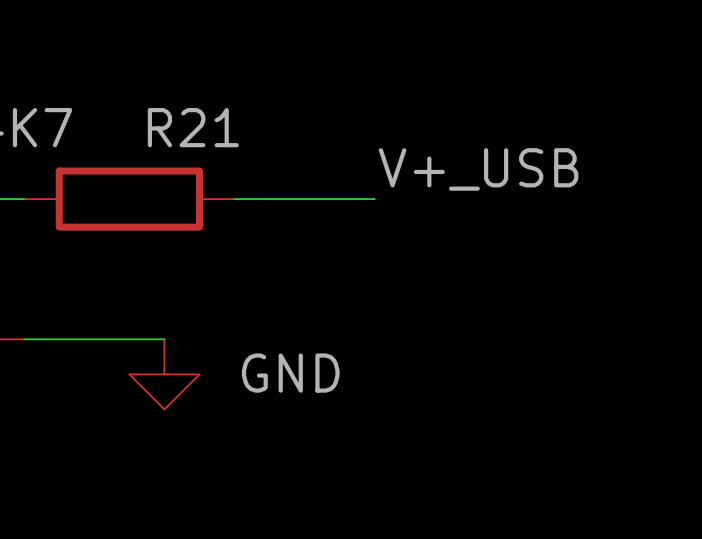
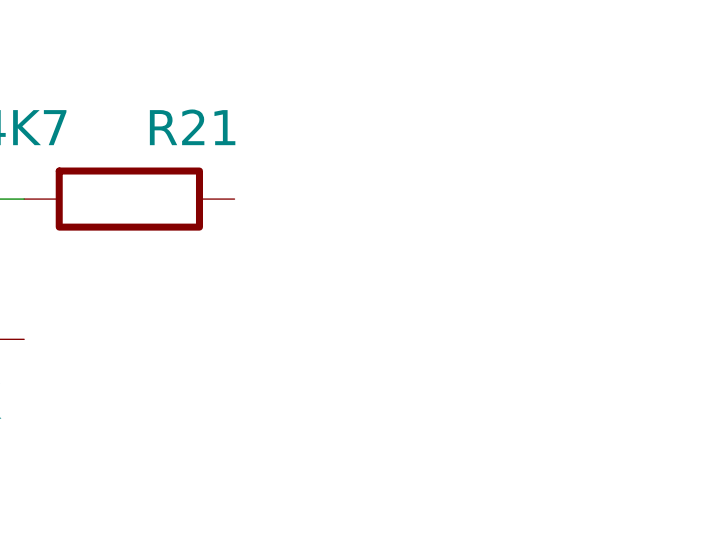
label: V+_USB (478, 169) -> none
wire: (234, 199) (374, 199) -> none
wire: (24, 339) (164, 339) -> none
power symbol: GND (164, 374) -> none

